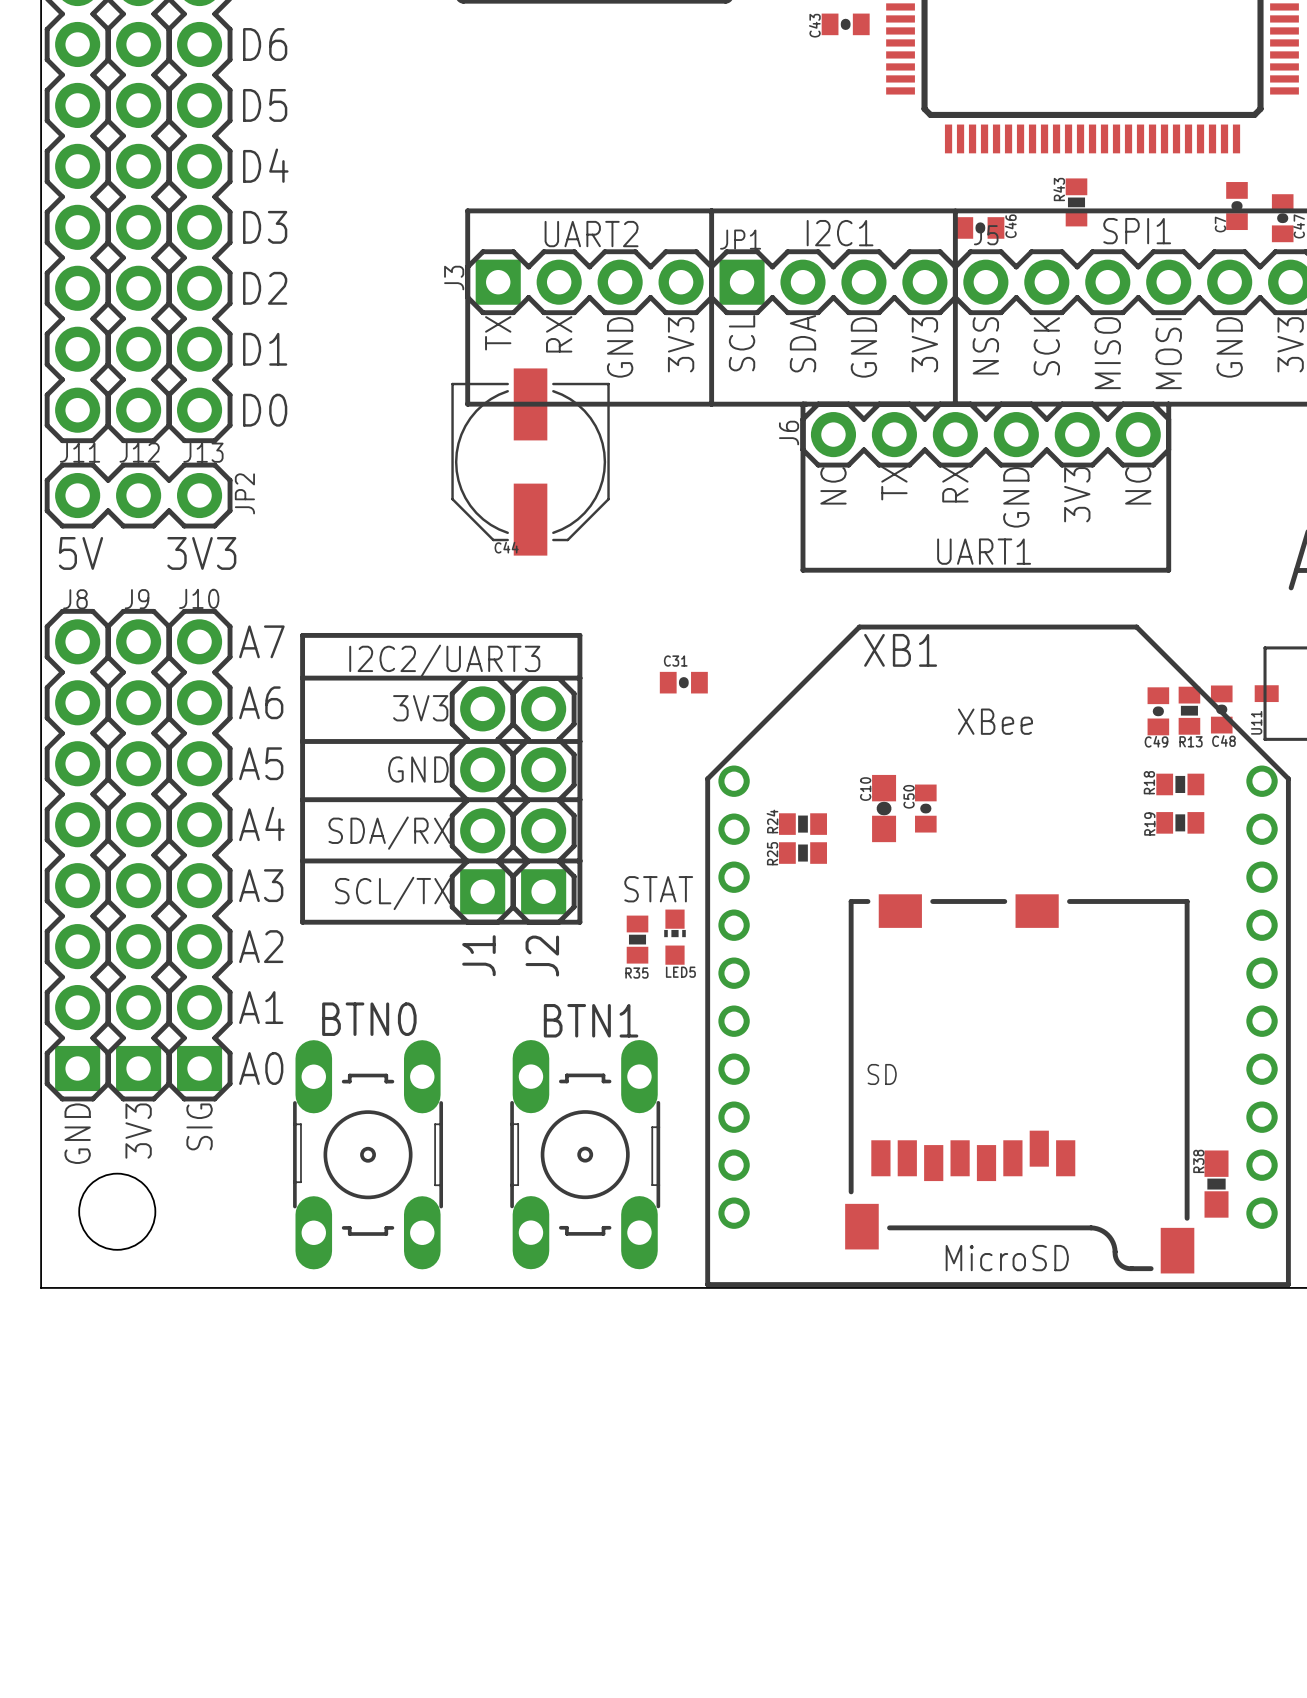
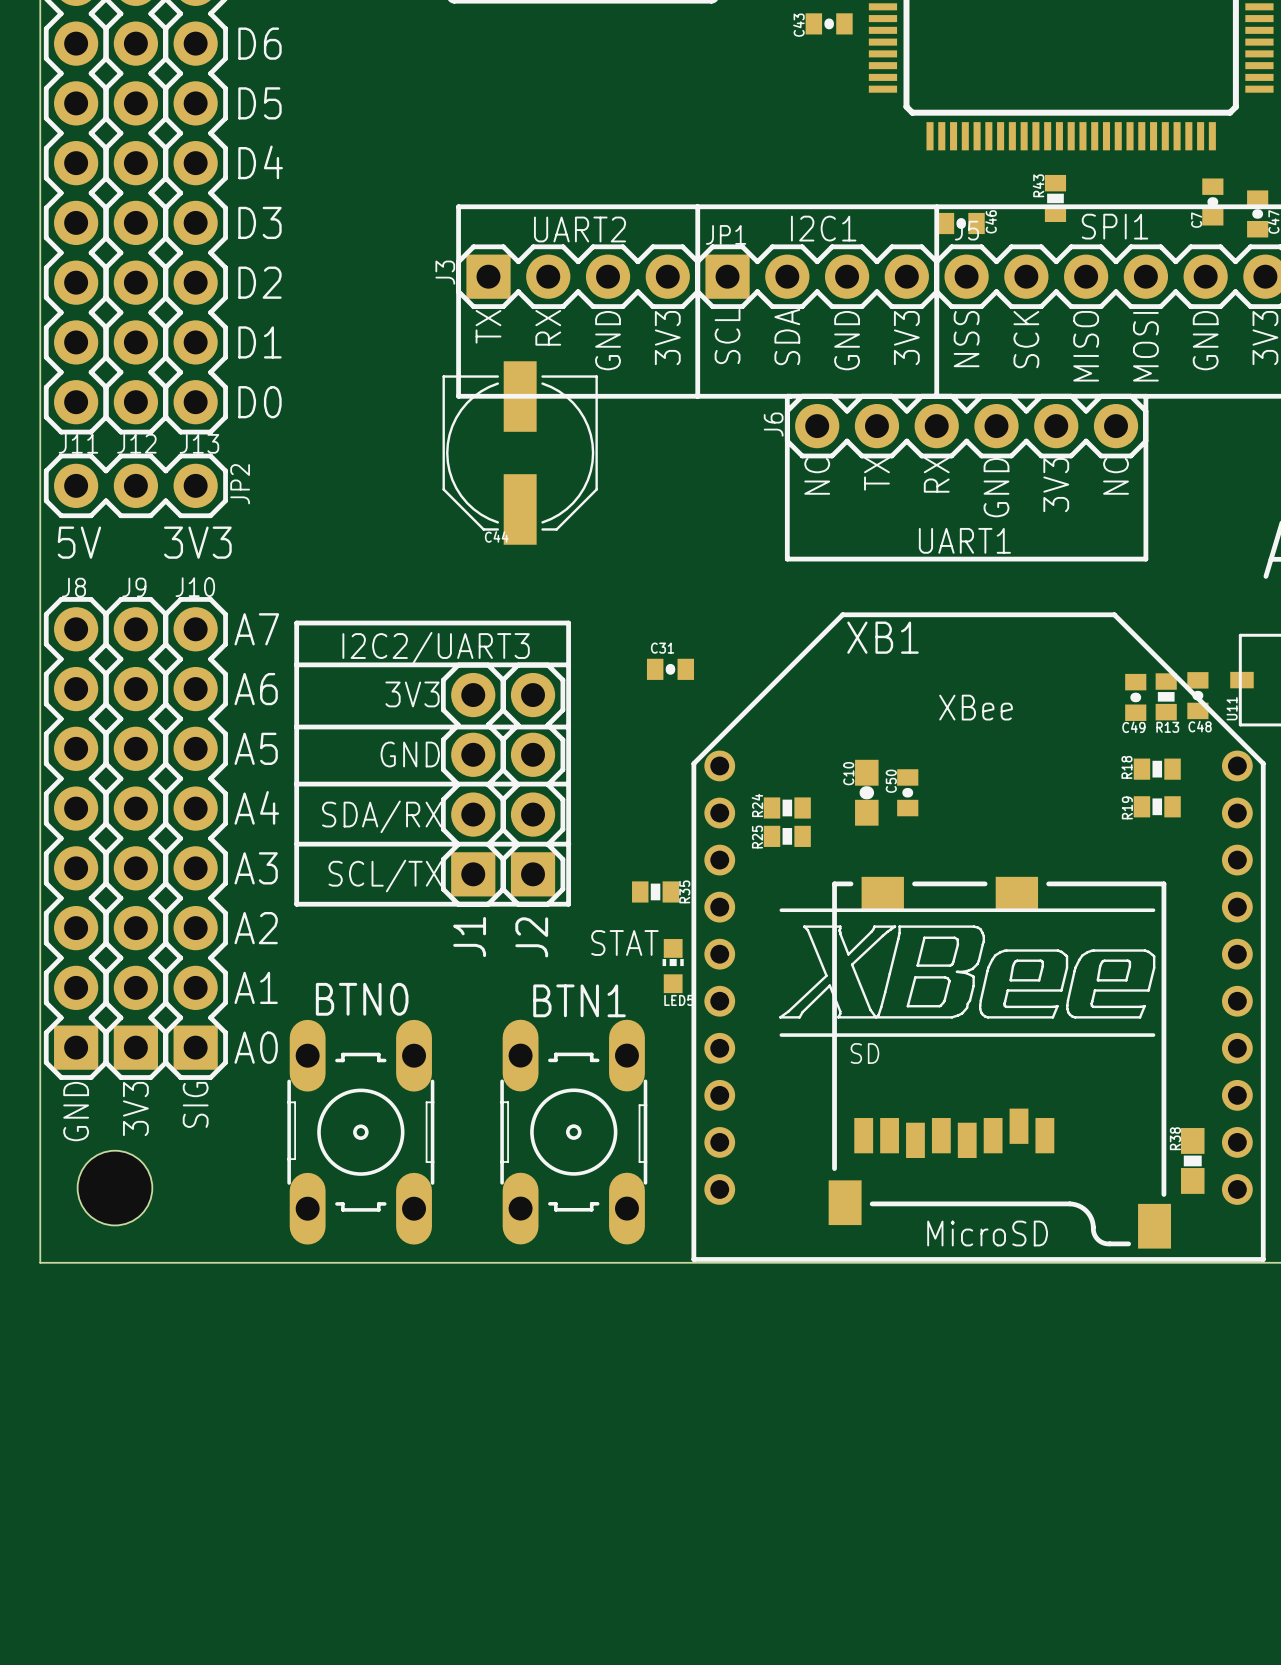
XB1 footprint: [705, 624, 1291, 1288] -> [691, 612, 1266, 1262]
text position: STAT (658, 889) -> STAT (624, 943)
LED5 position: (674, 937) -> (673, 966)
R35 rotation: 0° (637, 939) -> 90° clockwise (655, 891)
R35 position: (637, 939) -> (655, 891)

